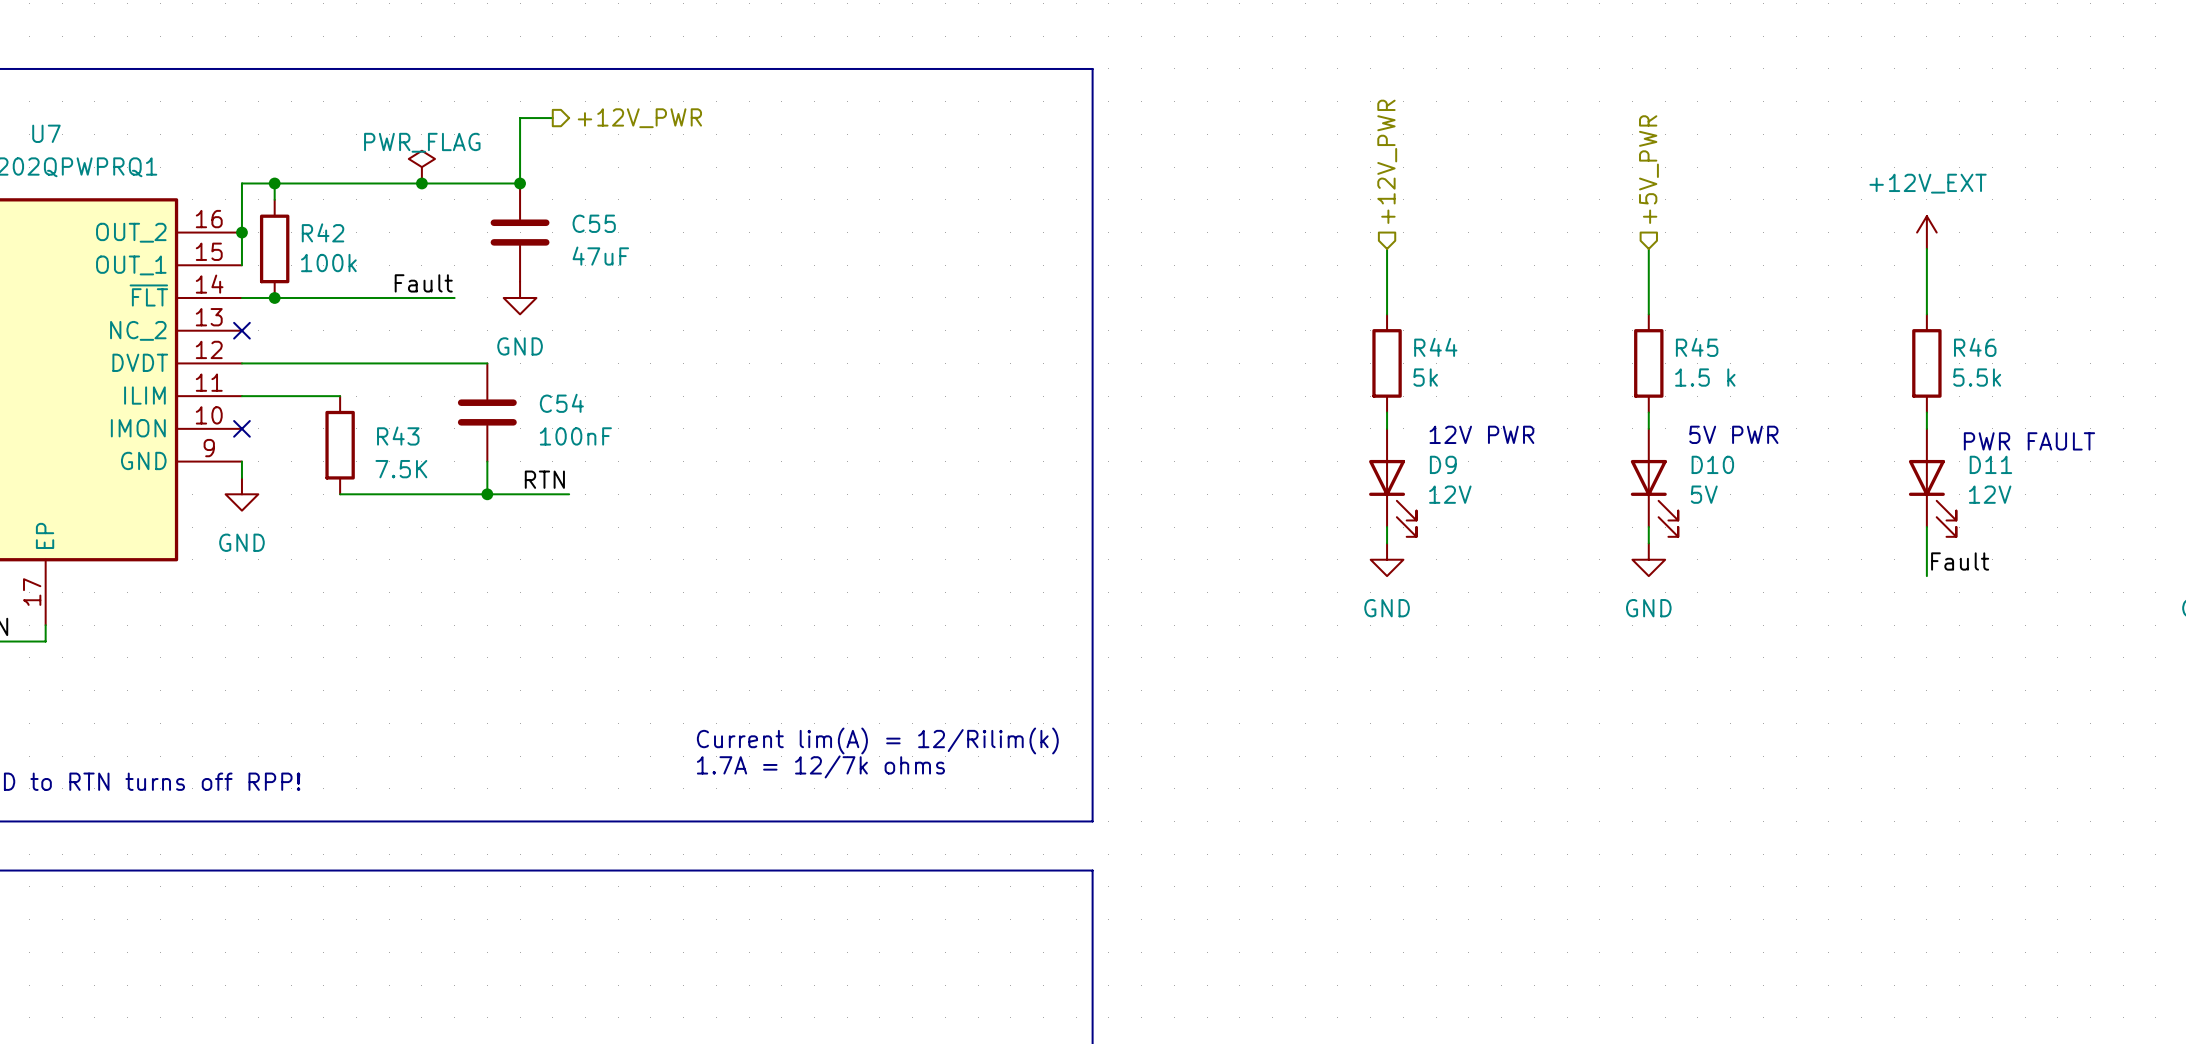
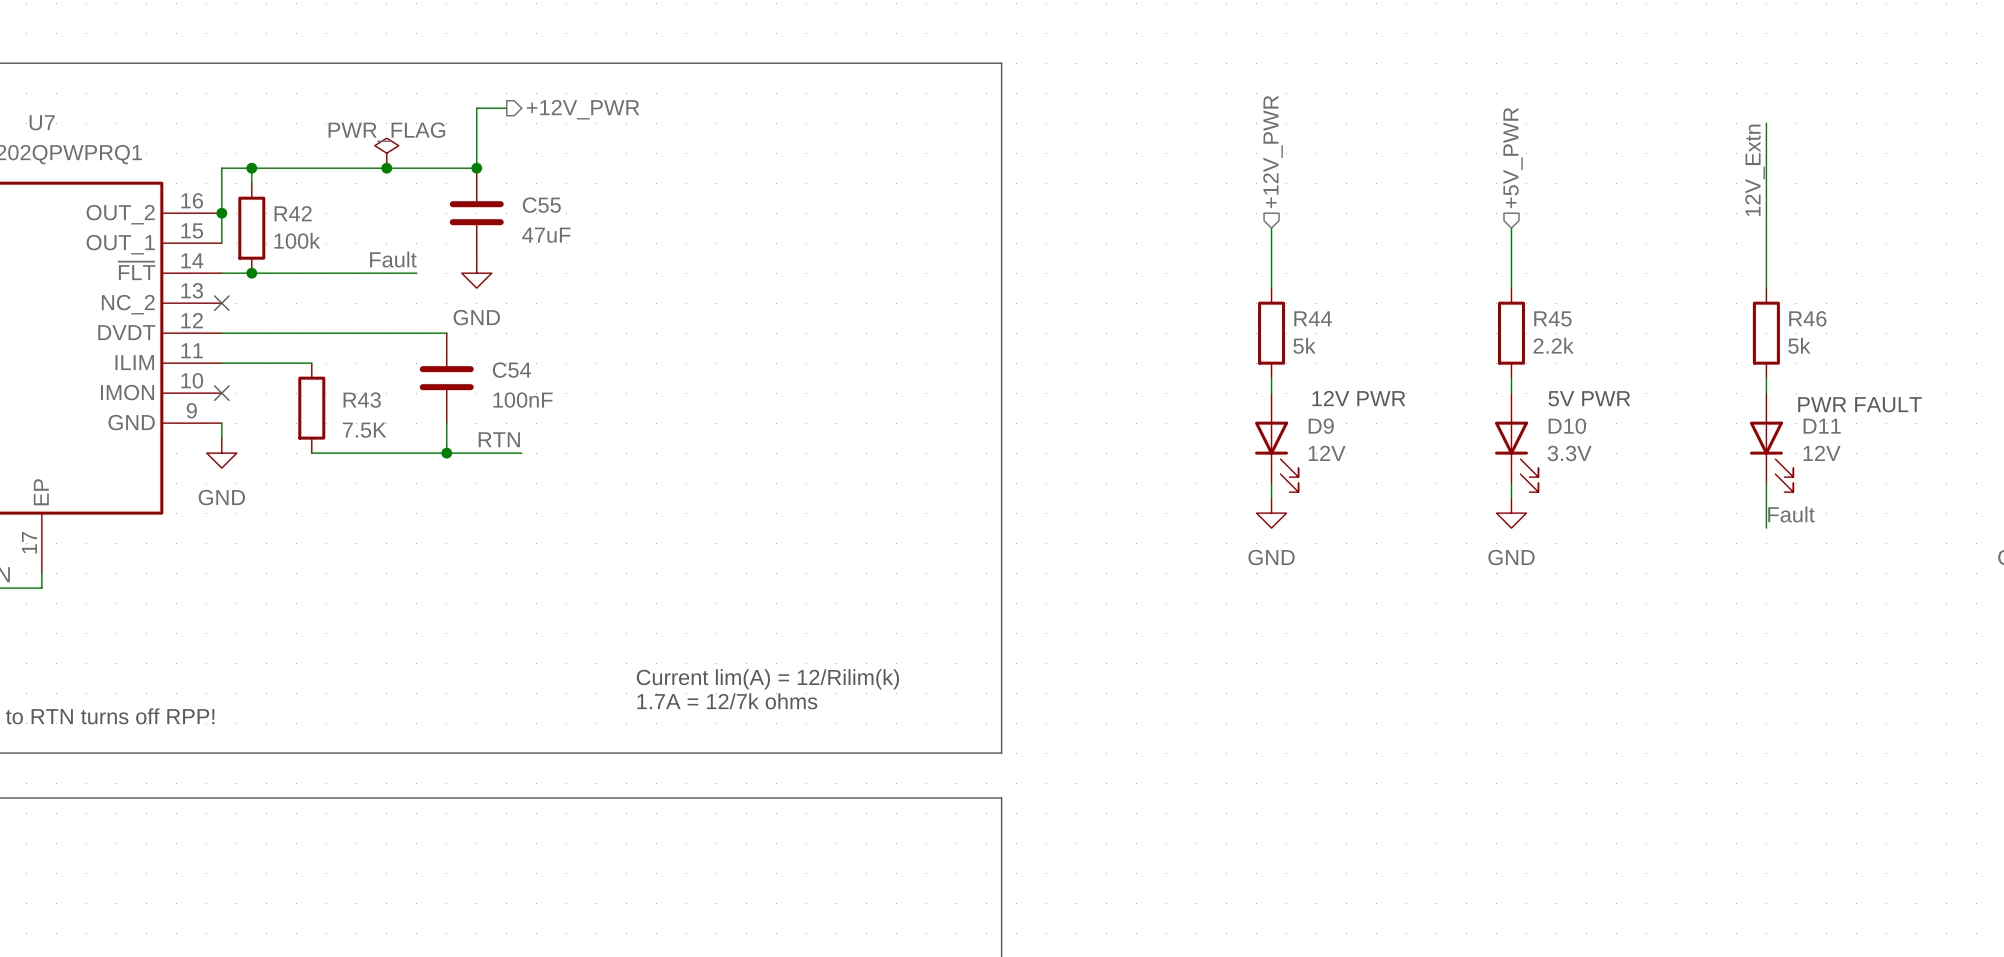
wire: none -> (1766, 123) (1766, 228)
label: none -> 12V_Extn (1755, 170)
power symbol: +12V_EXT (1926, 232) -> none
R45 value: 1.5 k (1705, 377) -> 2.2k (1553, 345)
R46 value: 5.5k (1977, 377) -> 5k (1799, 345)
D10 value: 5V (1704, 494) -> 3.3V (1569, 453)

